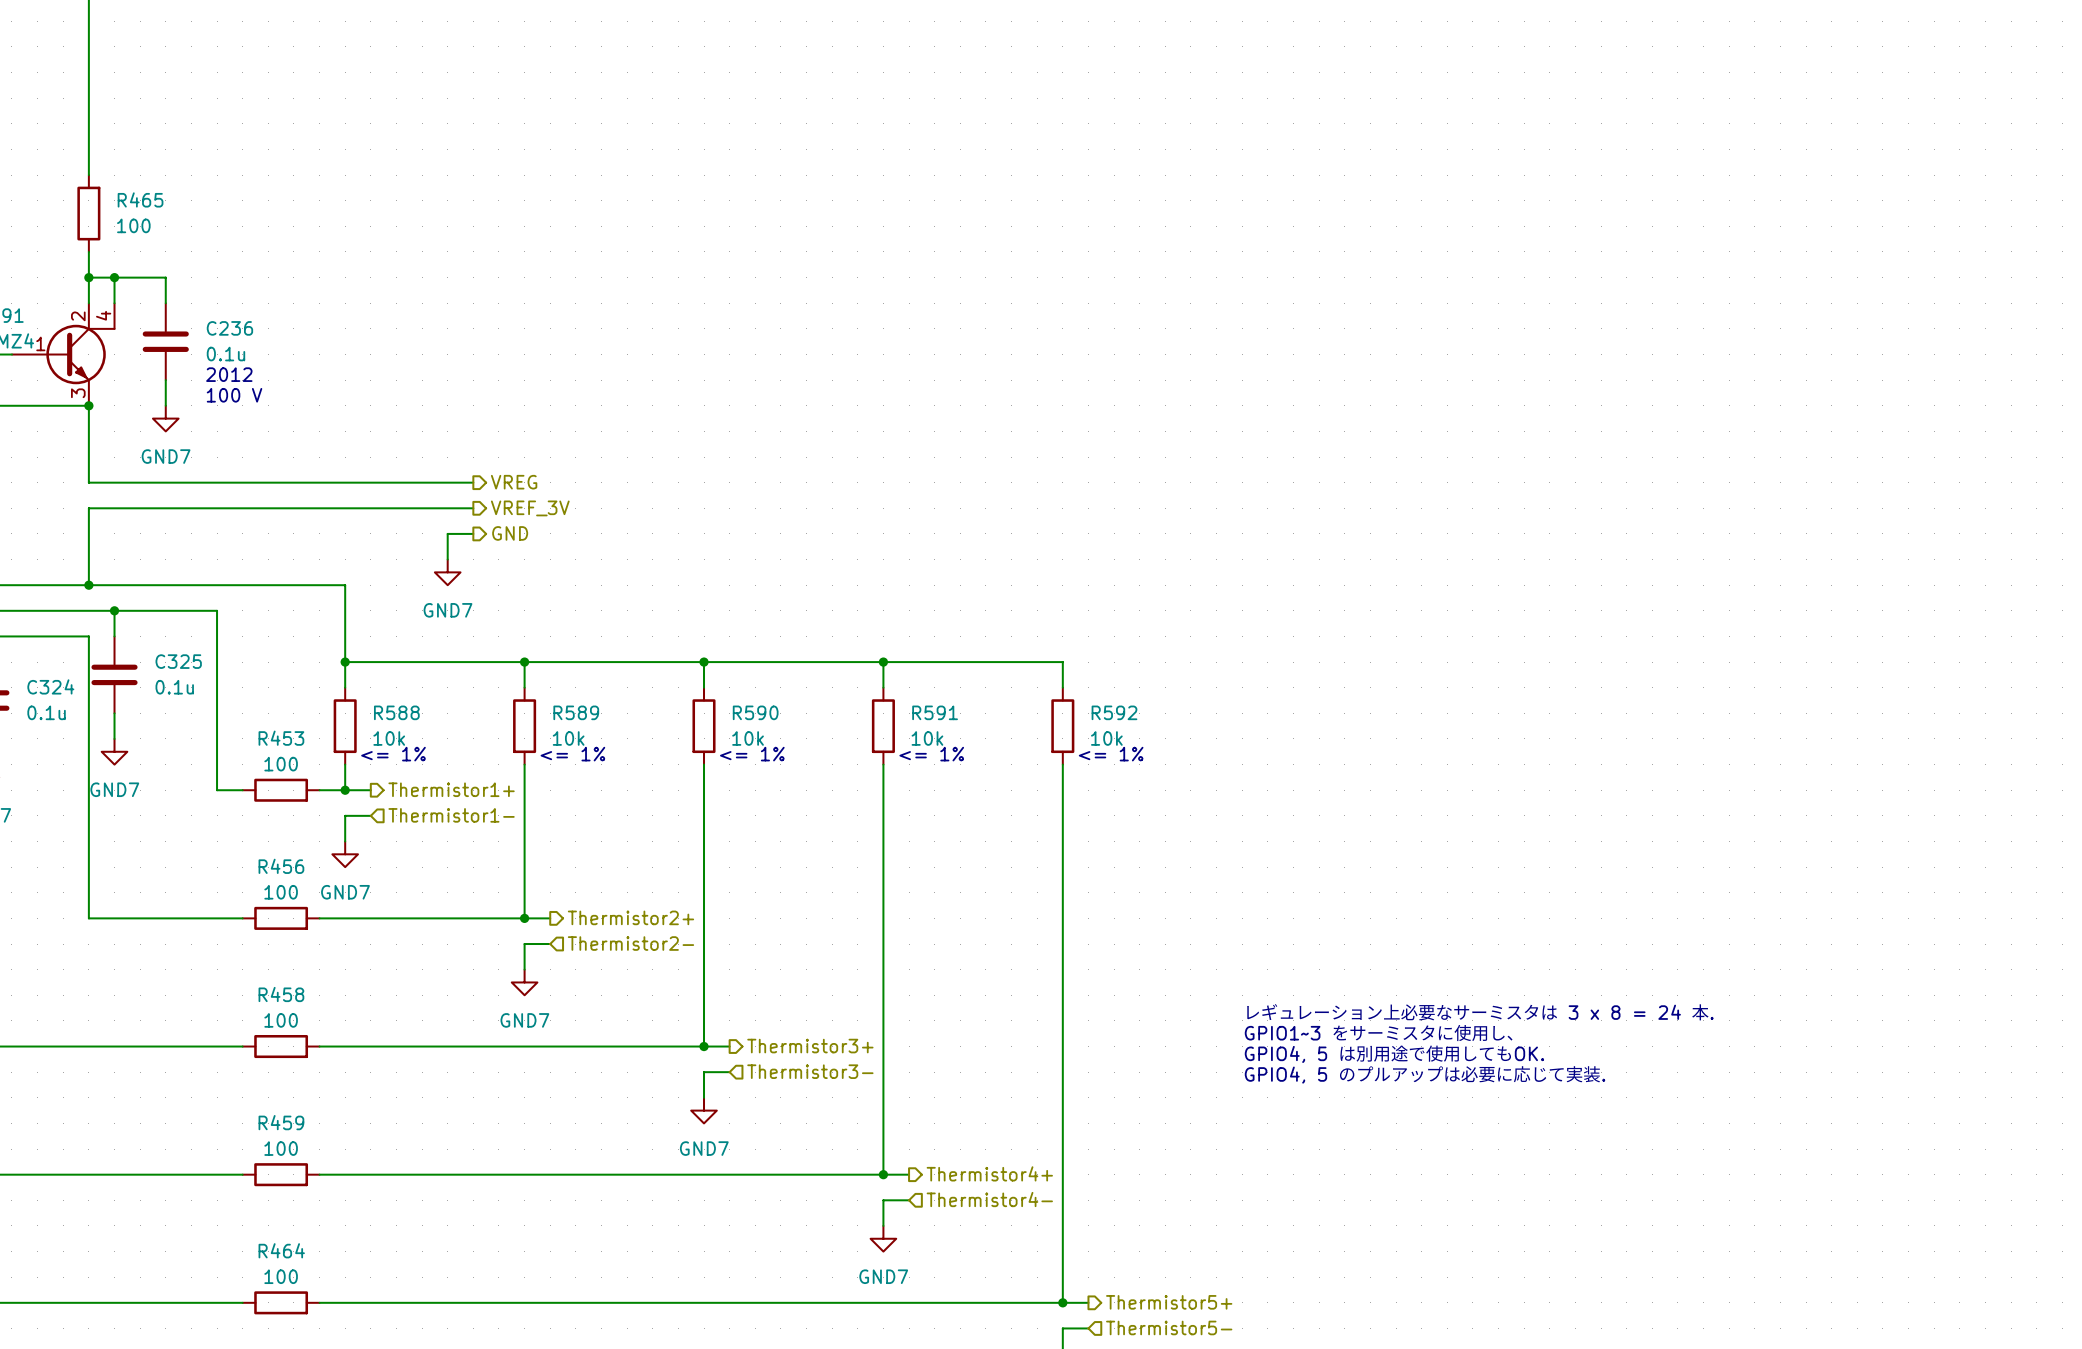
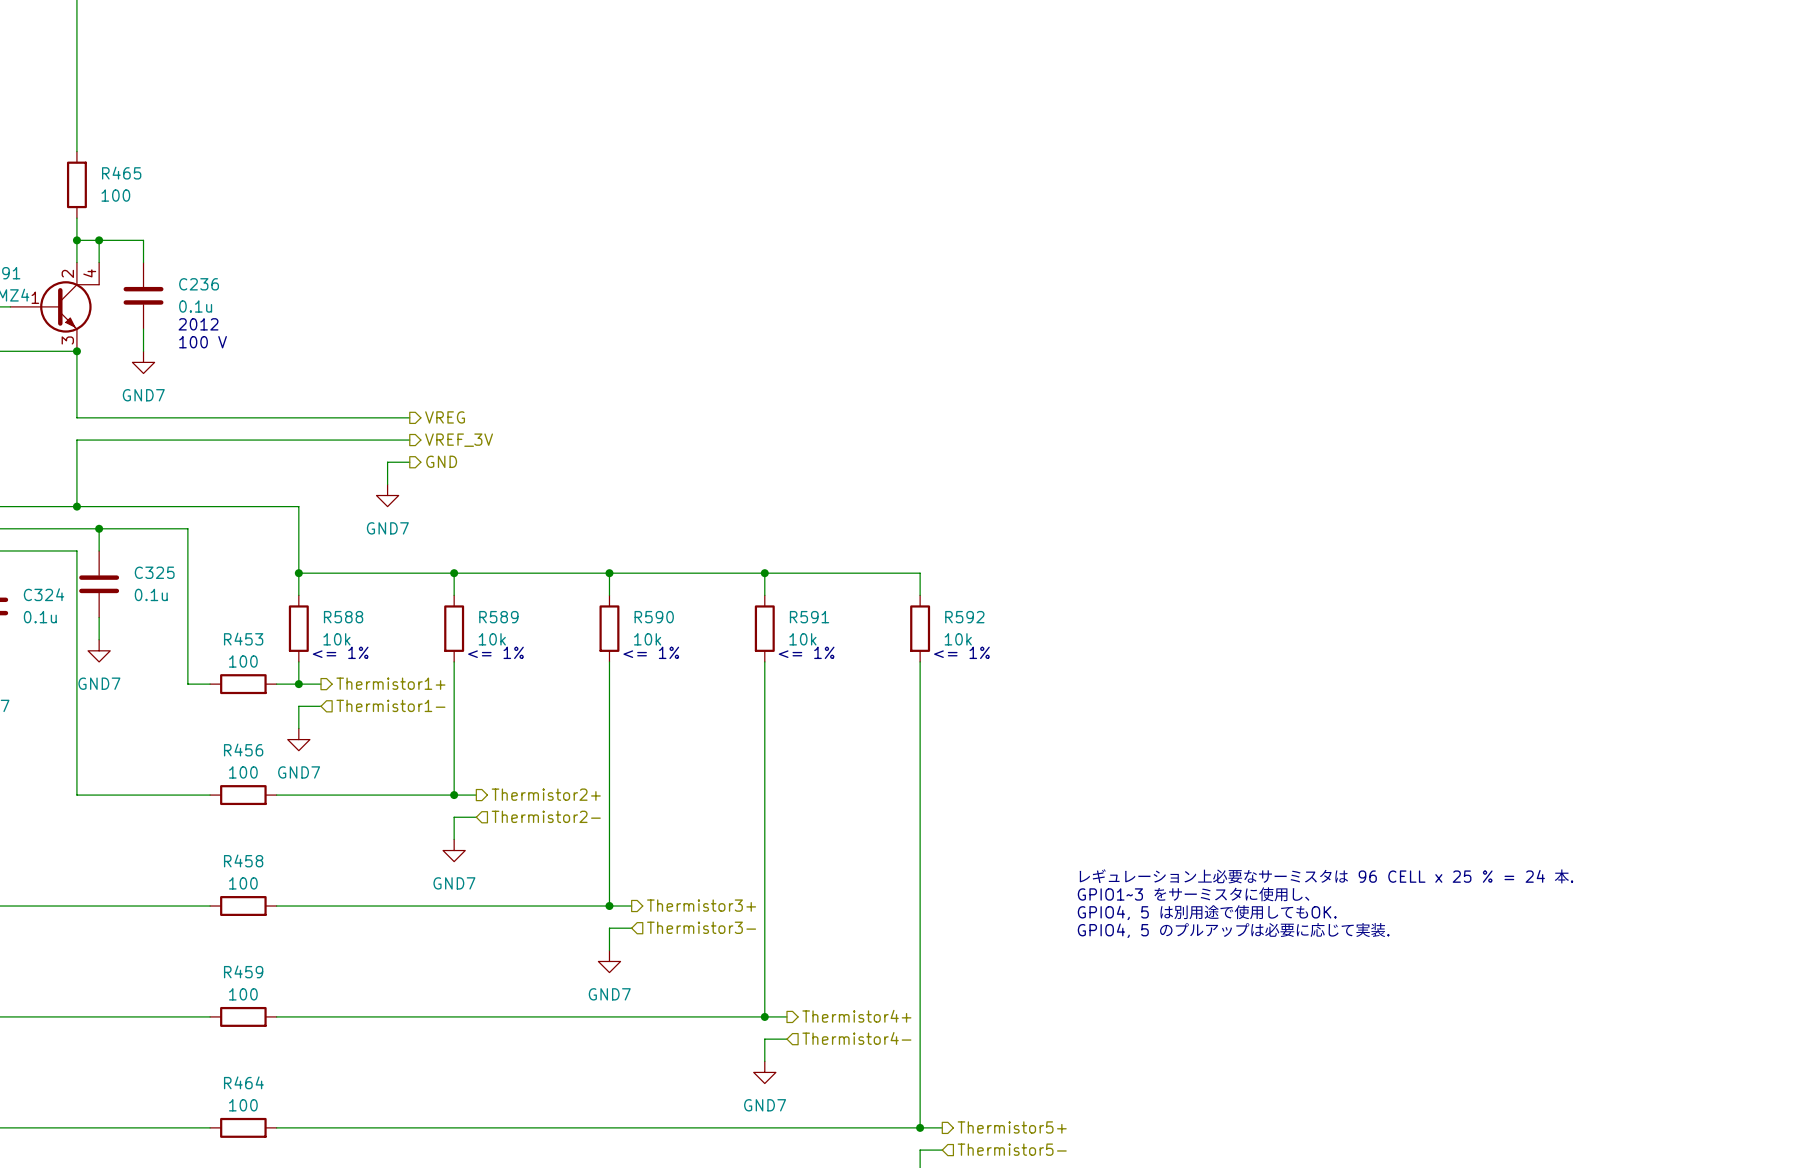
text: レギュレーション上必要なサーミスタは 3 x 8 = 24 本. (1479, 1012) -> レギュレーション上必要なサーミスタは 96 CELL x 25 % = 24 本. (1326, 876)

